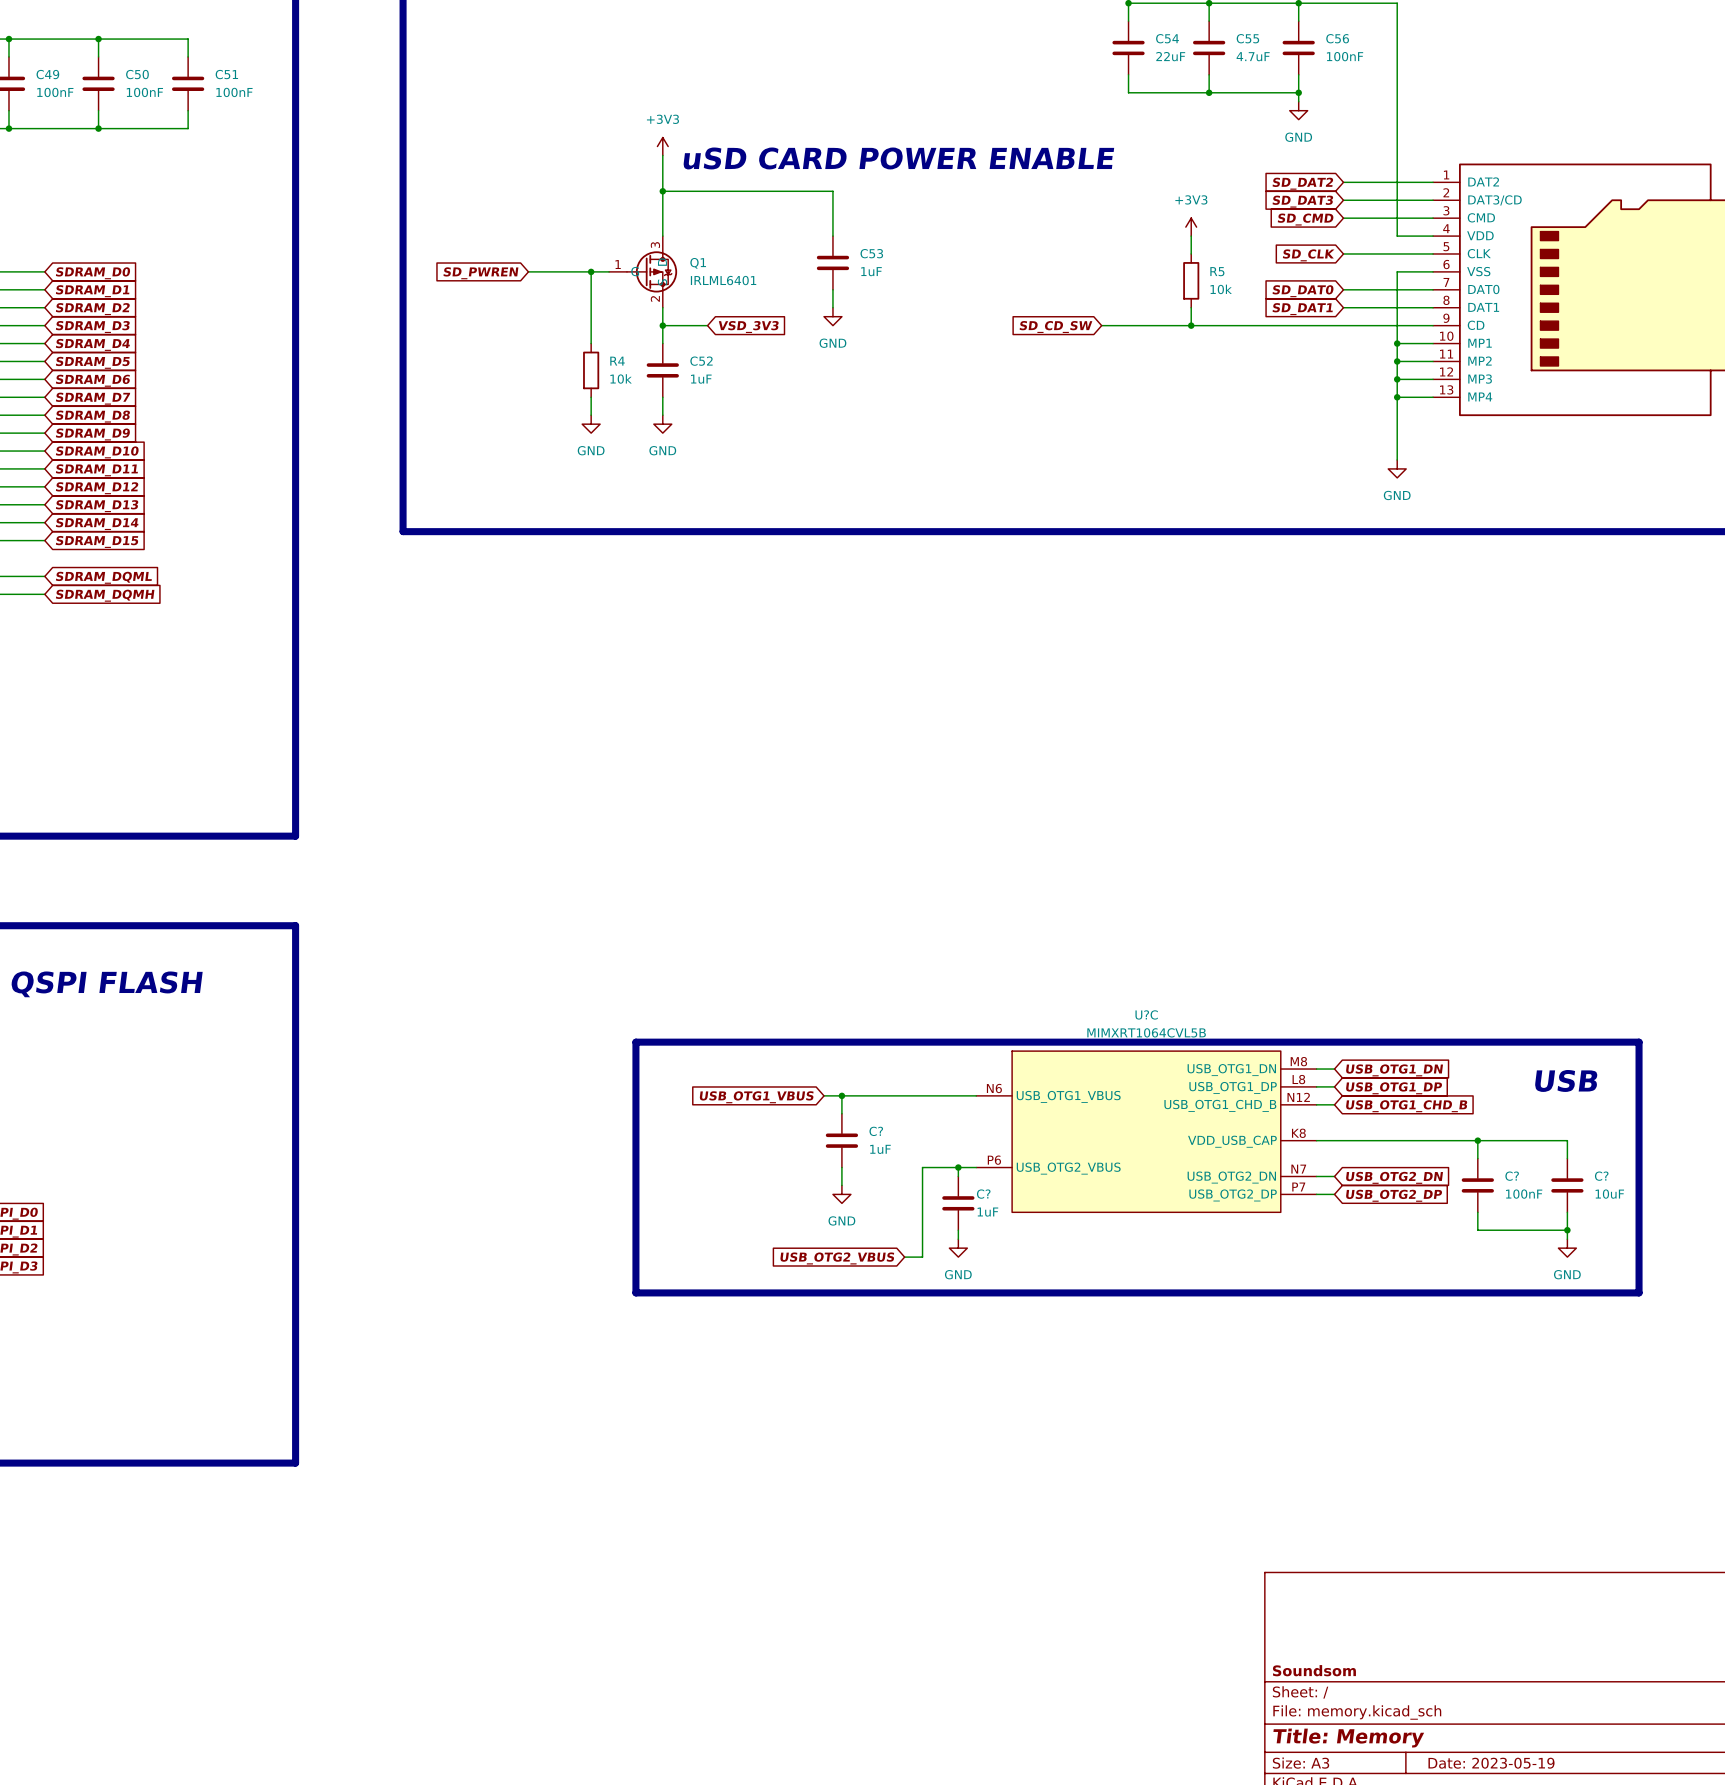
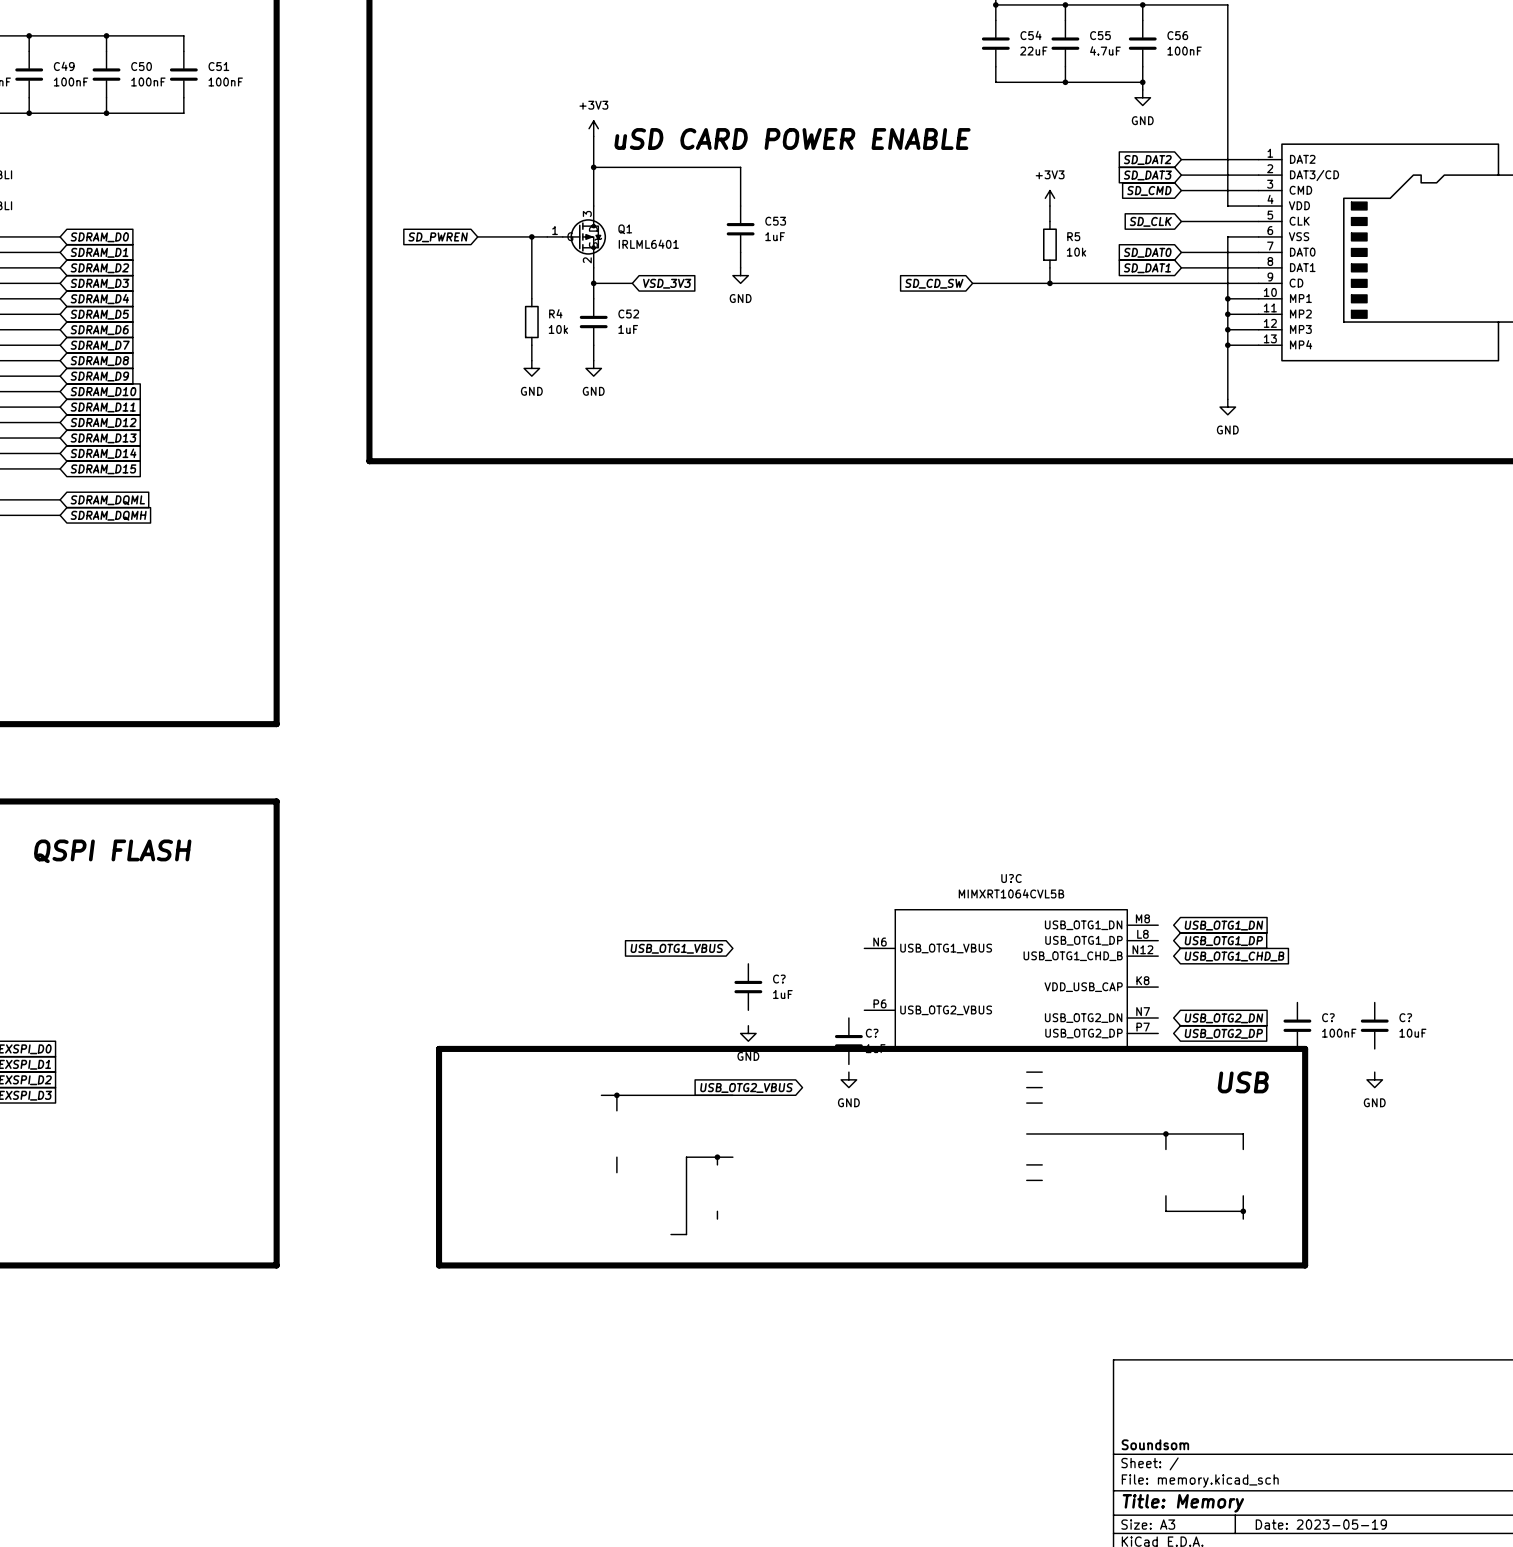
line: (635, 1042) (1639, 1042) (1639, 1292) (635, 1292) (635, 1042) -> none
wire: (1316, 1069) (1334, 1069) -> none
text: USB (1566, 1080) -> none
wire: (1316, 1086) (1334, 1086) -> none
wire: (824, 1095) (976, 1095) -> none
wire: (841, 1095) (841, 1113) -> none
junction: (841, 1095) -> none
wire: (1316, 1104) (1334, 1104) -> none
wire: (1316, 1140) (1567, 1140) (1567, 1158) -> none
wire: (1477, 1140) (1477, 1158) -> none
junction: (1477, 1140) -> none
wire: (841, 1167) (841, 1185) -> none
wire: (958, 1167) (958, 1176) -> none
junction: (958, 1167) -> none
wire: (976, 1167) (922, 1167) (922, 1257) (904, 1257) -> none
wire: (1316, 1176) (1334, 1176) -> (1026, 1072) (1042, 1072)
wire: (1316, 1194) (1334, 1194) -> (1026, 1087) (1042, 1087)
line: none -> (439, 1048) (1305, 1048) (1305, 1265) (439, 1265) (439, 1048)
wire: (1477, 1212) (1477, 1230) (1567, 1230) -> none
wire: (1567, 1212) (1567, 1239) -> none
wire: (958, 1230) (958, 1239) -> none
junction: (1567, 1230) -> none
text: none -> USB (1243, 1082)
wire: none -> (601, 1095) (732, 1095)
wire: none -> (616, 1095) (616, 1110)
junction: none -> (616, 1095)
wire: none -> (1026, 1103) (1042, 1103)
wire: none -> (1026, 1133) (1243, 1133) (1243, 1149)
wire: none -> (1165, 1133) (1165, 1149)
junction: none -> (1165, 1133)
wire: none -> (616, 1157) (616, 1172)
wire: none -> (717, 1157) (717, 1164)
junction: none -> (717, 1157)
wire: none -> (732, 1157) (686, 1157) (686, 1234) (671, 1234)
wire: none -> (1026, 1164) (1042, 1164)
wire: none -> (1026, 1180) (1042, 1180)
wire: none -> (1165, 1195) (1165, 1211) (1243, 1211)
wire: none -> (1243, 1195) (1243, 1219)
wire: none -> (717, 1211) (717, 1219)
junction: none -> (1243, 1211)

